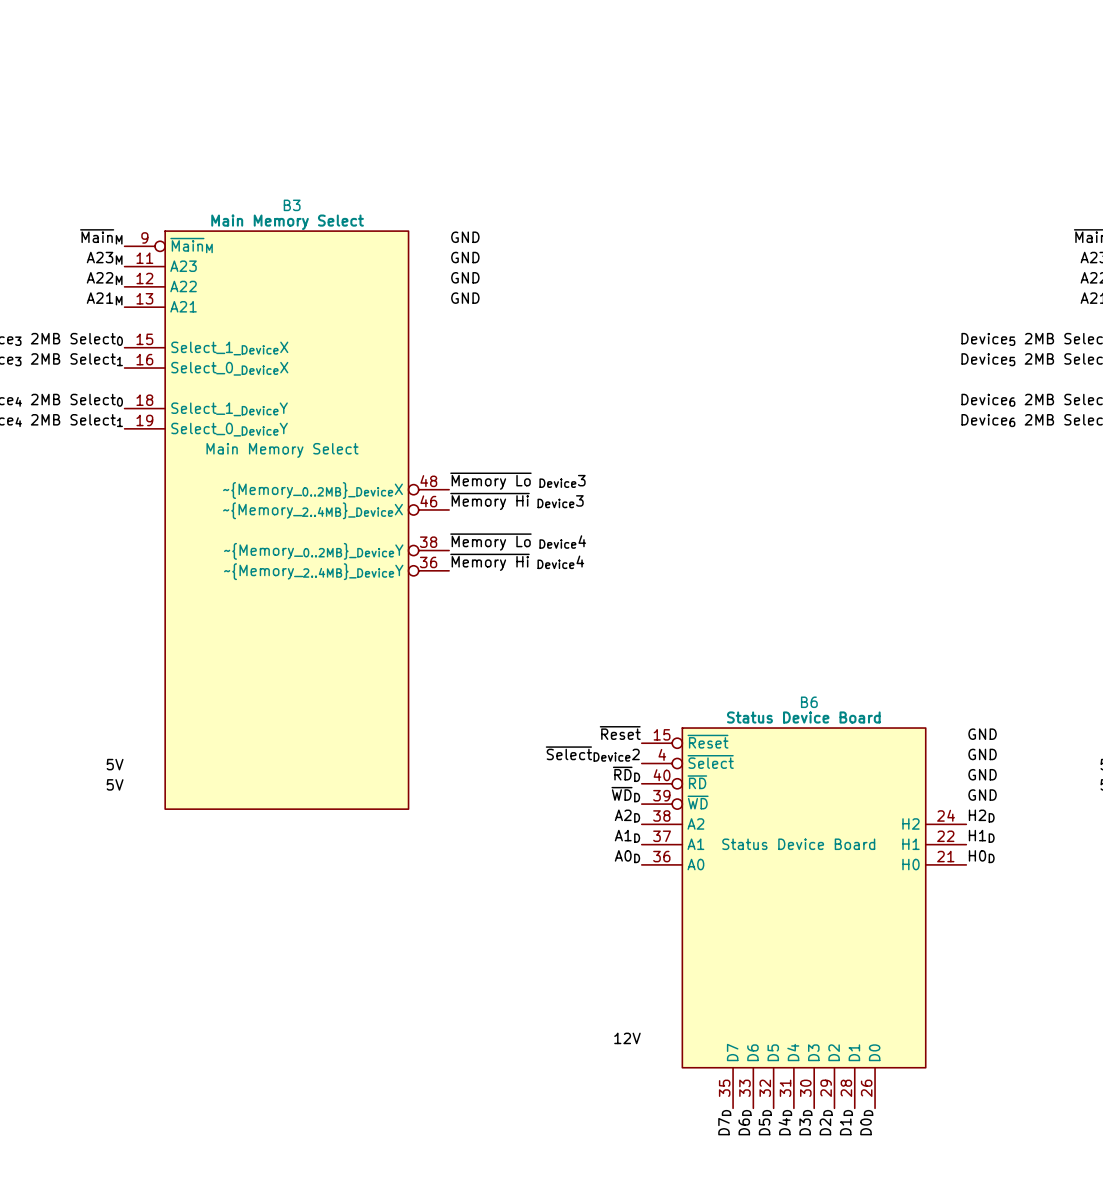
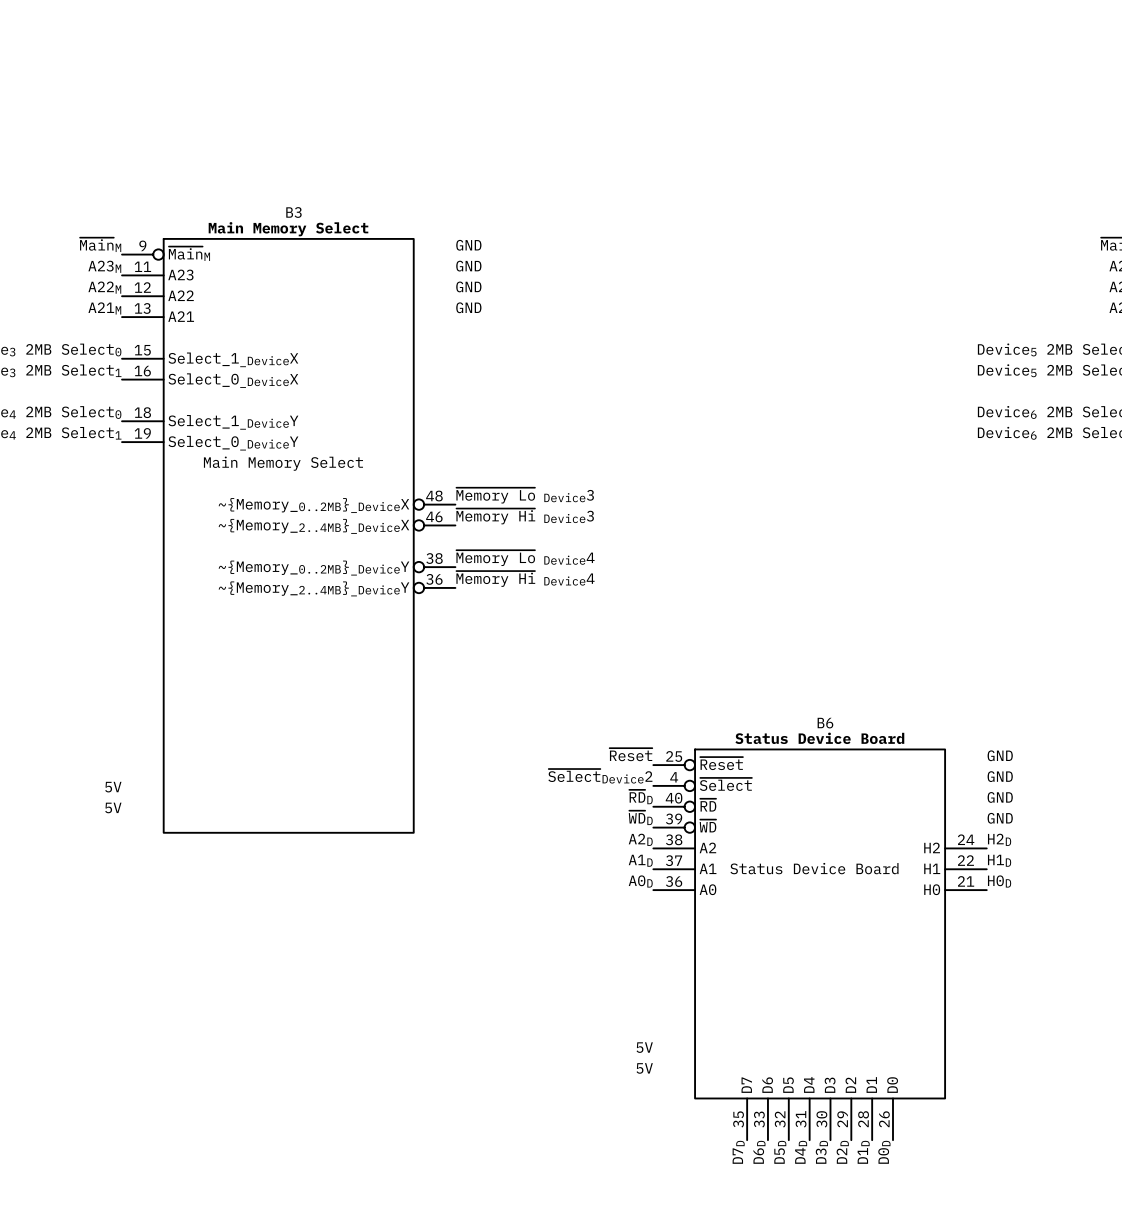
B6 pin number: 15 (662, 734) -> 25 (674, 756)
label: none -> 5V (644, 1047)
label: 12V (627, 1038) -> 5V (644, 1068)

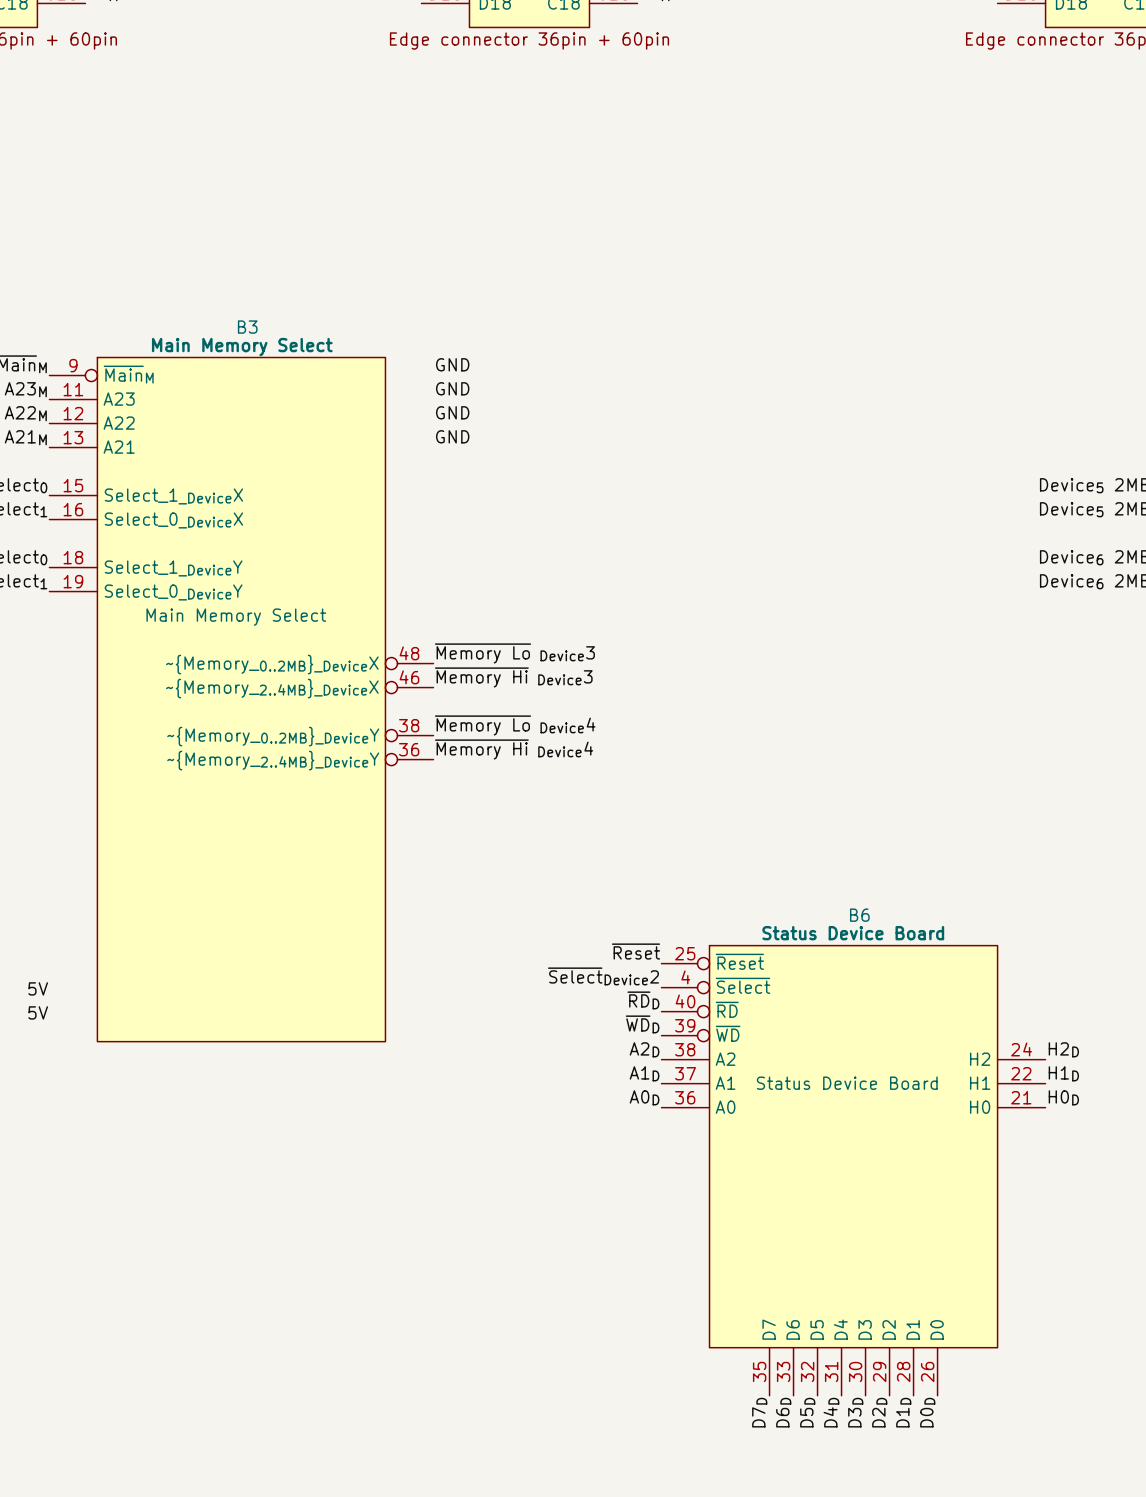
label: GND (1000, 755) -> none
label: GND (1000, 776) -> none
label: GND (1000, 797) -> none
label: GND (1000, 818) -> none
label: 5V (644, 1047) -> none
label: 5V (644, 1068) -> none

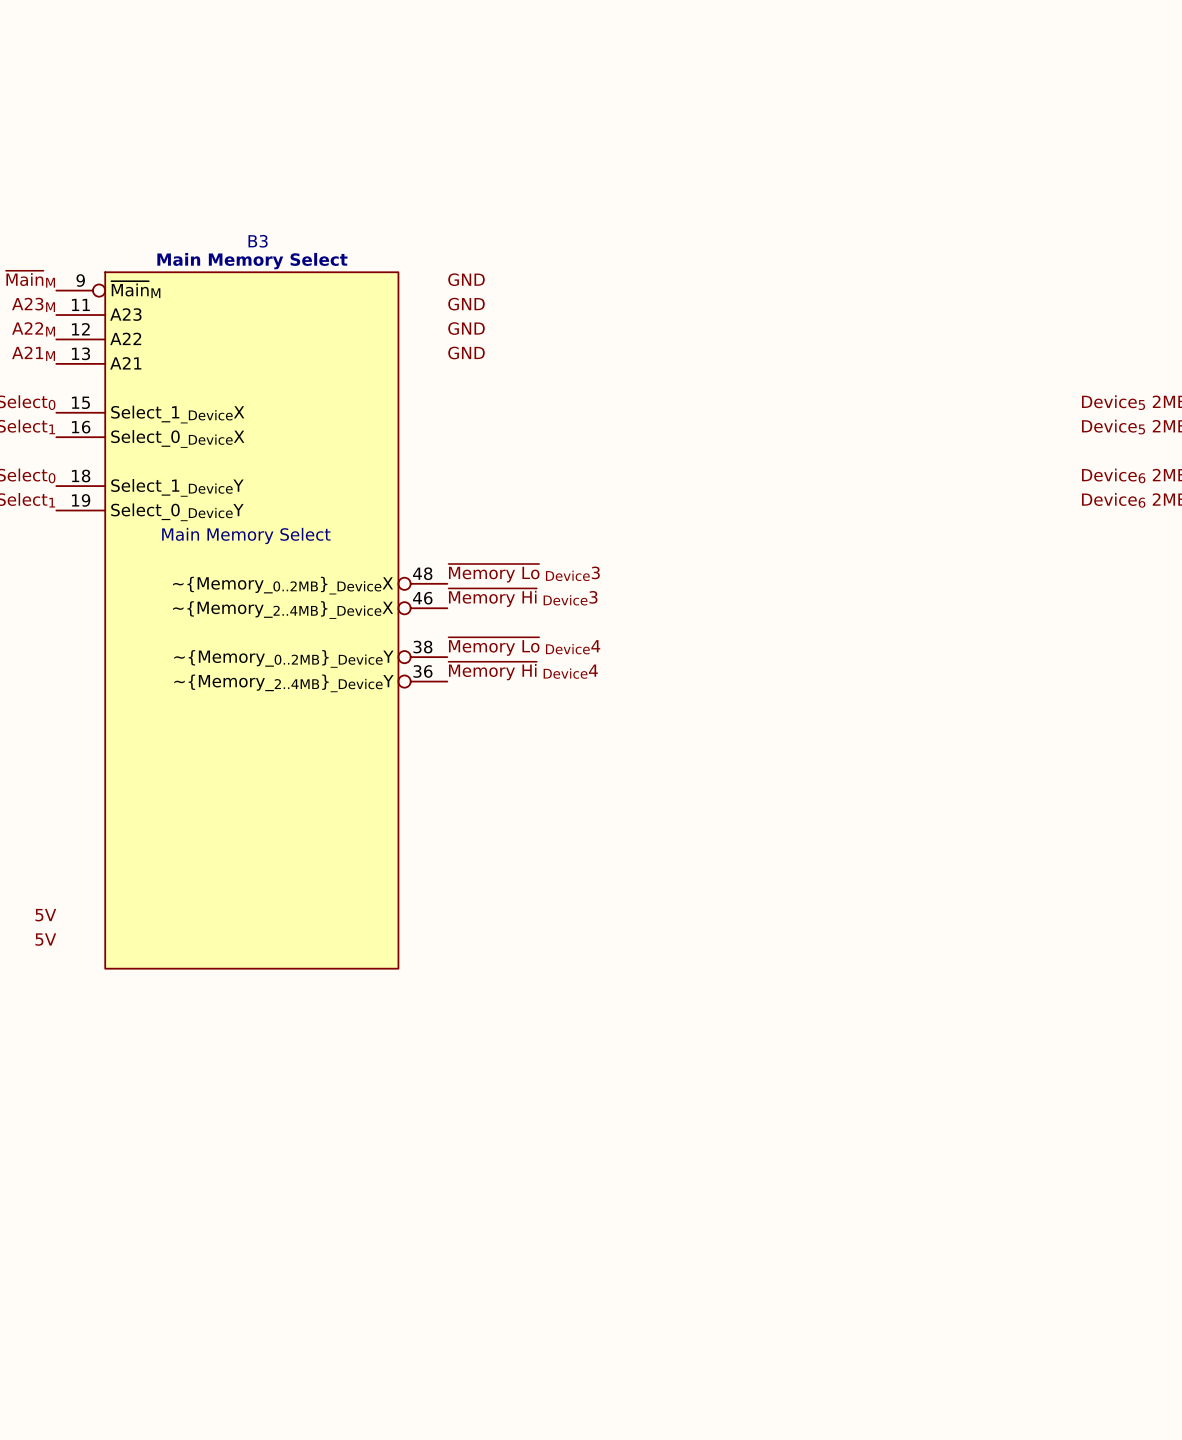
label: ~{Reset} (636, 951) -> none
label: ~{Select}Device2 (603, 976) -> none
label: ~{RD}D (643, 1000) -> none
label: ~{WD}D (642, 1024) -> none
label: A2D (644, 1049) -> none
label: H2D (1063, 1049) -> none
label: A1D (644, 1073) -> none
label: H1D (1063, 1073) -> none
label: A0D (644, 1097) -> none
label: H0D (1063, 1097) -> none
B6: Status Device Board (853, 1170) -> none
label: D7D (759, 1412) -> none
label: D6D (783, 1412) -> none
label: D5D (807, 1412) -> none
label: D4D (831, 1412) -> none
label: D3D (855, 1412) -> none
label: D2D (879, 1412) -> none
label: D1D (903, 1412) -> none
label: D0D (927, 1412) -> none

